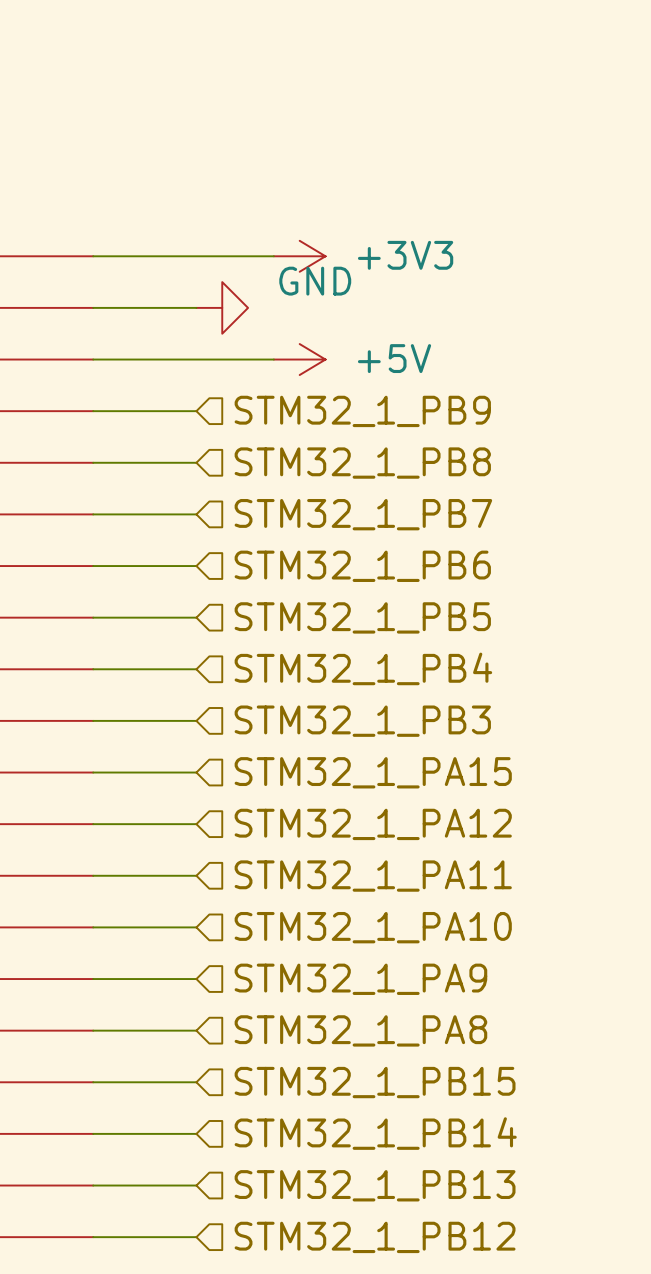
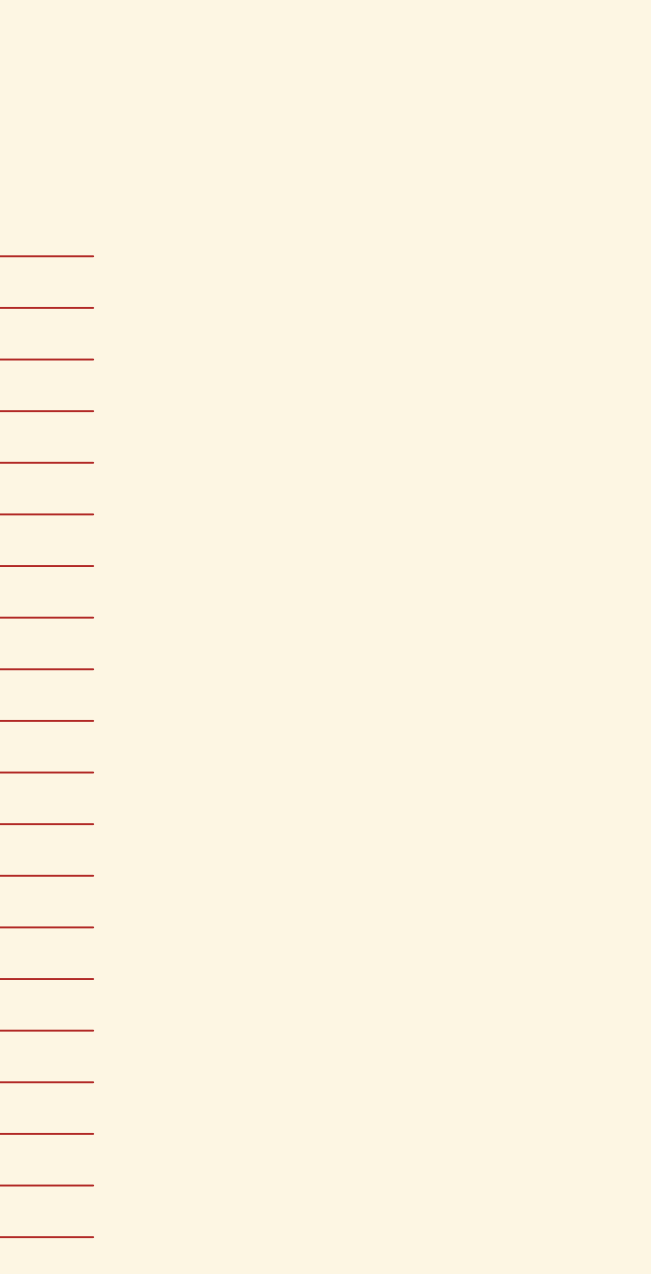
wire: (93, 256) (273, 256) -> none
power symbol: +3V3 (299, 256) -> none
wire: (93, 307) (196, 307) -> none
power symbol: GND (222, 307) -> none
wire: (93, 359) (273, 359) -> none
power symbol: +5V (299, 359) -> none
wire: (93, 411) (196, 411) -> none
hierarchical label: STM32_1_PB9 (362, 411) -> none
wire: (93, 462) (196, 462) -> none
hierarchical label: STM32_1_PB8 (362, 463) -> none
wire: (93, 514) (196, 514) -> none
hierarchical label: STM32_1_PB7 (363, 514) -> none
wire: (93, 566) (196, 566) -> none
hierarchical label: STM32_1_PB6 (362, 566) -> none
wire: (93, 617) (196, 617) -> none
hierarchical label: STM32_1_PB5 (362, 617) -> none
hierarchical label: STM32_1_PB4 (363, 668) -> none
wire: (93, 669) (196, 669) -> none
wire: (93, 720) (196, 720) -> none
hierarchical label: STM32_1_PB3 (362, 721) -> none
wire: (93, 772) (196, 772) -> none
hierarchical label: STM32_1_PA15 (373, 772) -> none
wire: (93, 824) (196, 824) -> none
hierarchical label: STM32_1_PA12 (373, 824) -> none
wire: (93, 875) (196, 875) -> none
hierarchical label: STM32_1_PA11 (373, 876) -> none
wire: (93, 927) (196, 927) -> none
hierarchical label: STM32_1_PA10 (373, 927) -> none
wire: (93, 979) (196, 979) -> none
hierarchical label: STM32_1_PA9 (360, 979) -> none
wire: (93, 1030) (196, 1030) -> none
hierarchical label: STM32_1_PA8 (360, 1030) -> none
wire: (93, 1082) (196, 1082) -> none
hierarchical label: STM32_1_PB15 (375, 1082) -> none
wire: (93, 1133) (196, 1133) -> none
hierarchical label: STM32_1_PB14 (375, 1133) -> none
wire: (93, 1185) (196, 1185) -> none
hierarchical label: STM32_1_PB13 (375, 1185) -> none
wire: (93, 1237) (196, 1237) -> none
hierarchical label: STM32_1_PB12 (375, 1237) -> none

